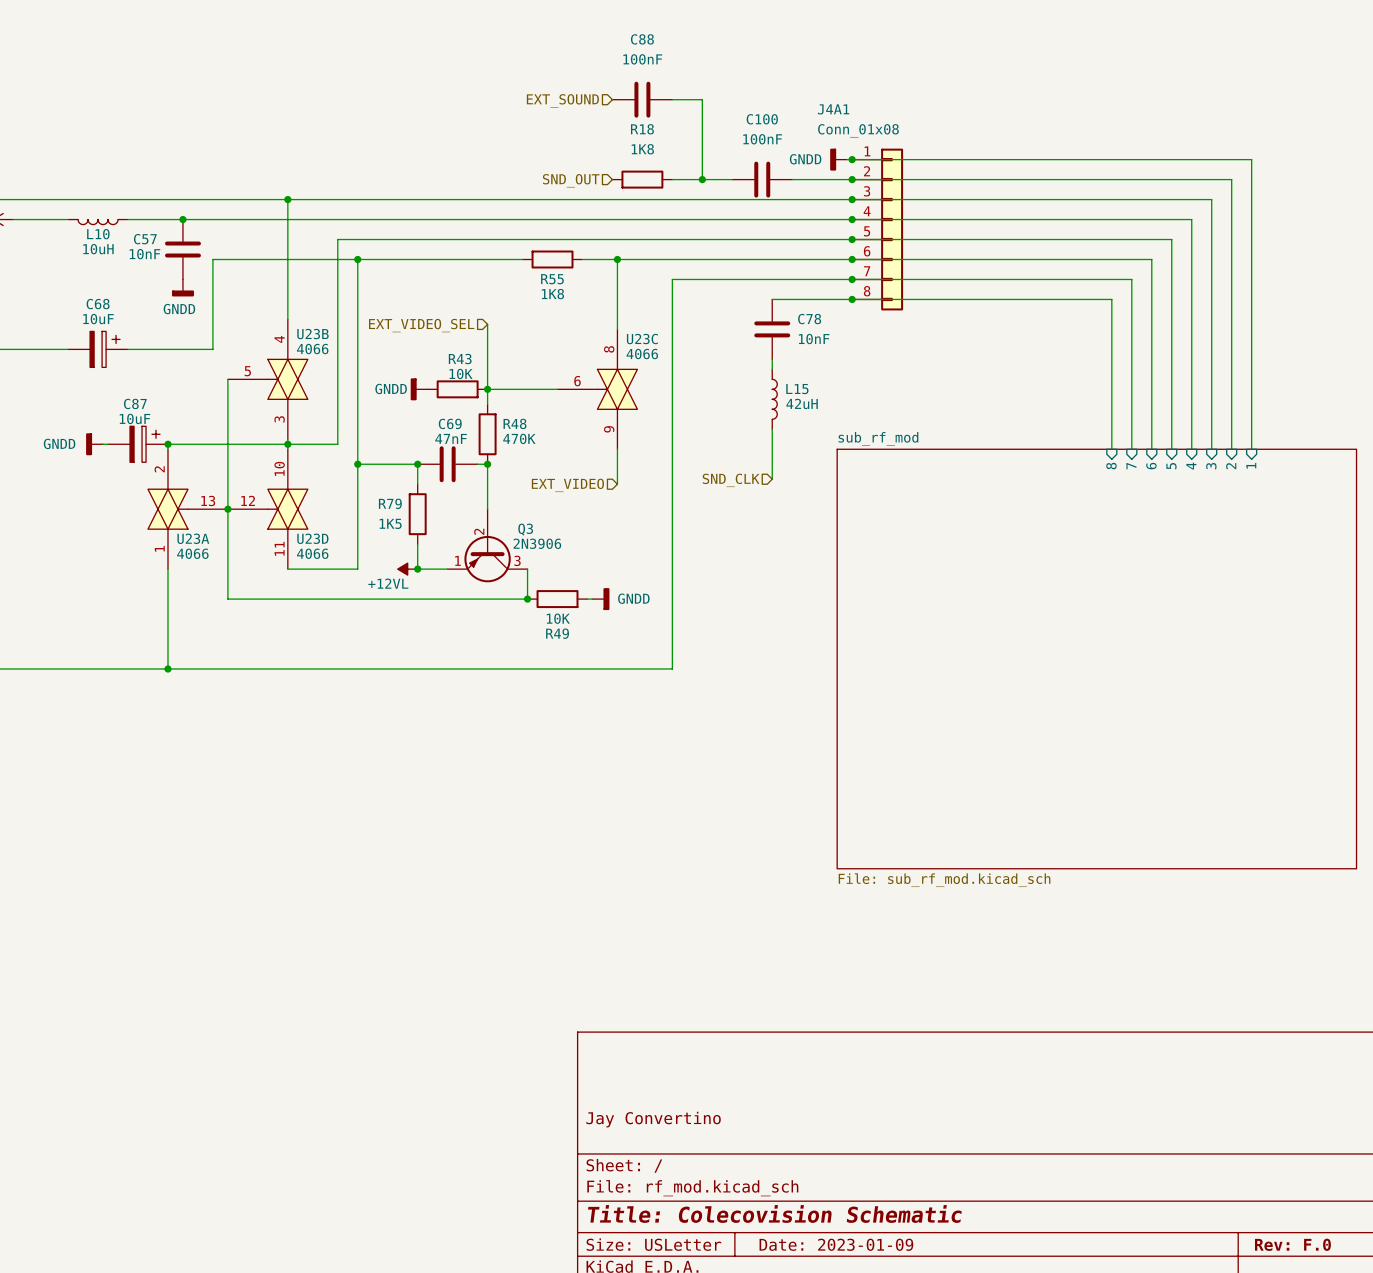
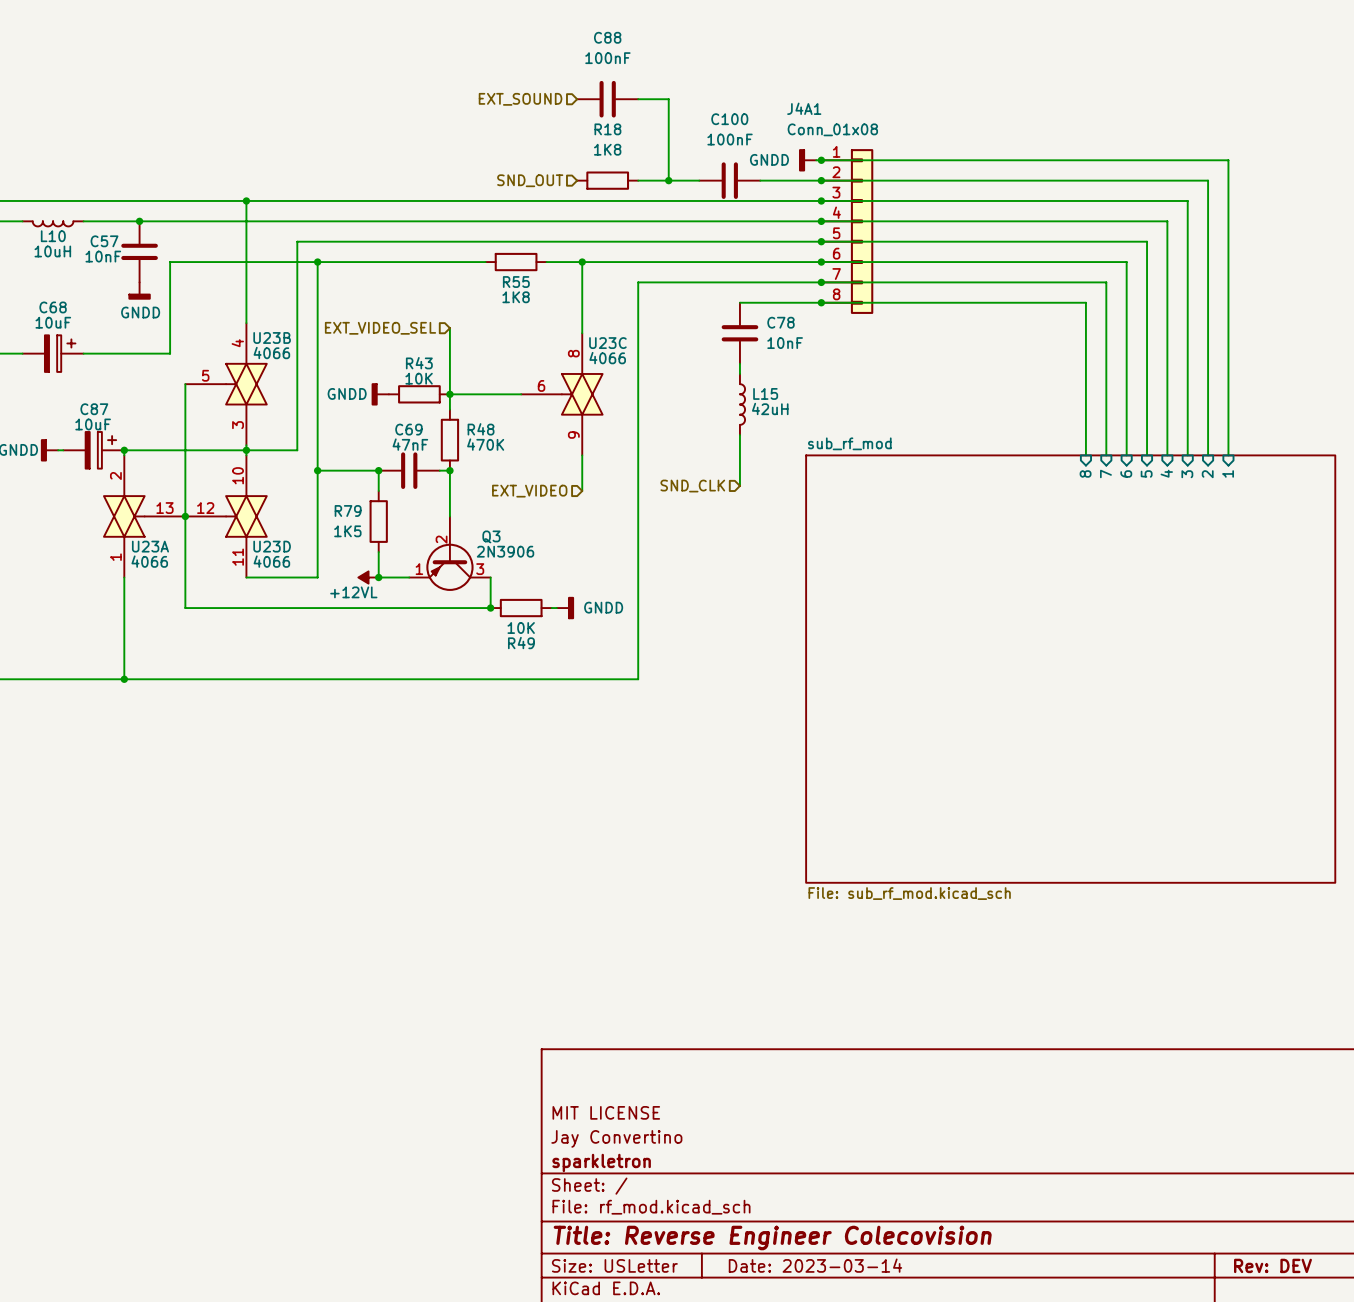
title block: none -> MIT LICENSE (606, 1112)
title block: none -> sparkletron (601, 1162)
title block: Title: Colecovision Schematic (774, 1213) -> Title: Reverse Engineer Colecovision (772, 1237)
title block: Date: 2023-01-09 (836, 1244) -> Date: 2023-03-14 (815, 1265)
title block: Rev: F.0 (1292, 1244) -> Rev: DEV (1272, 1265)

